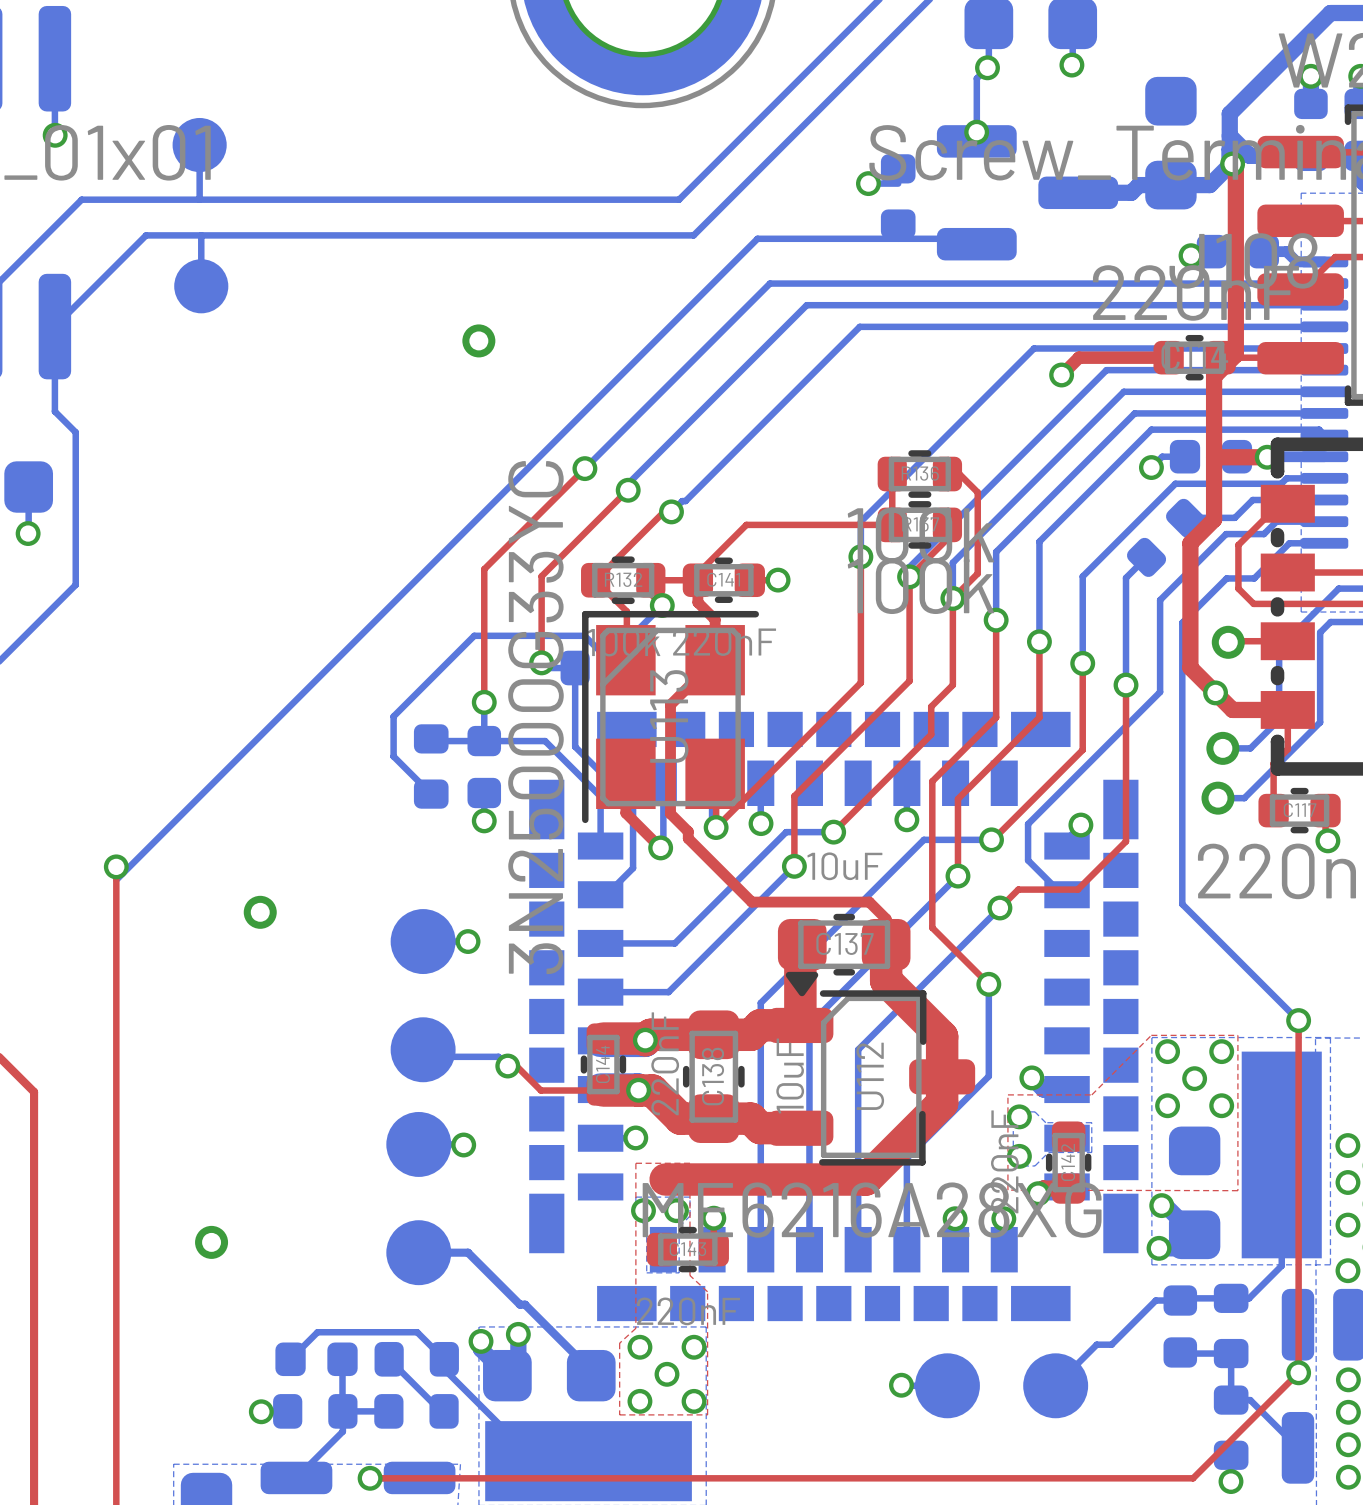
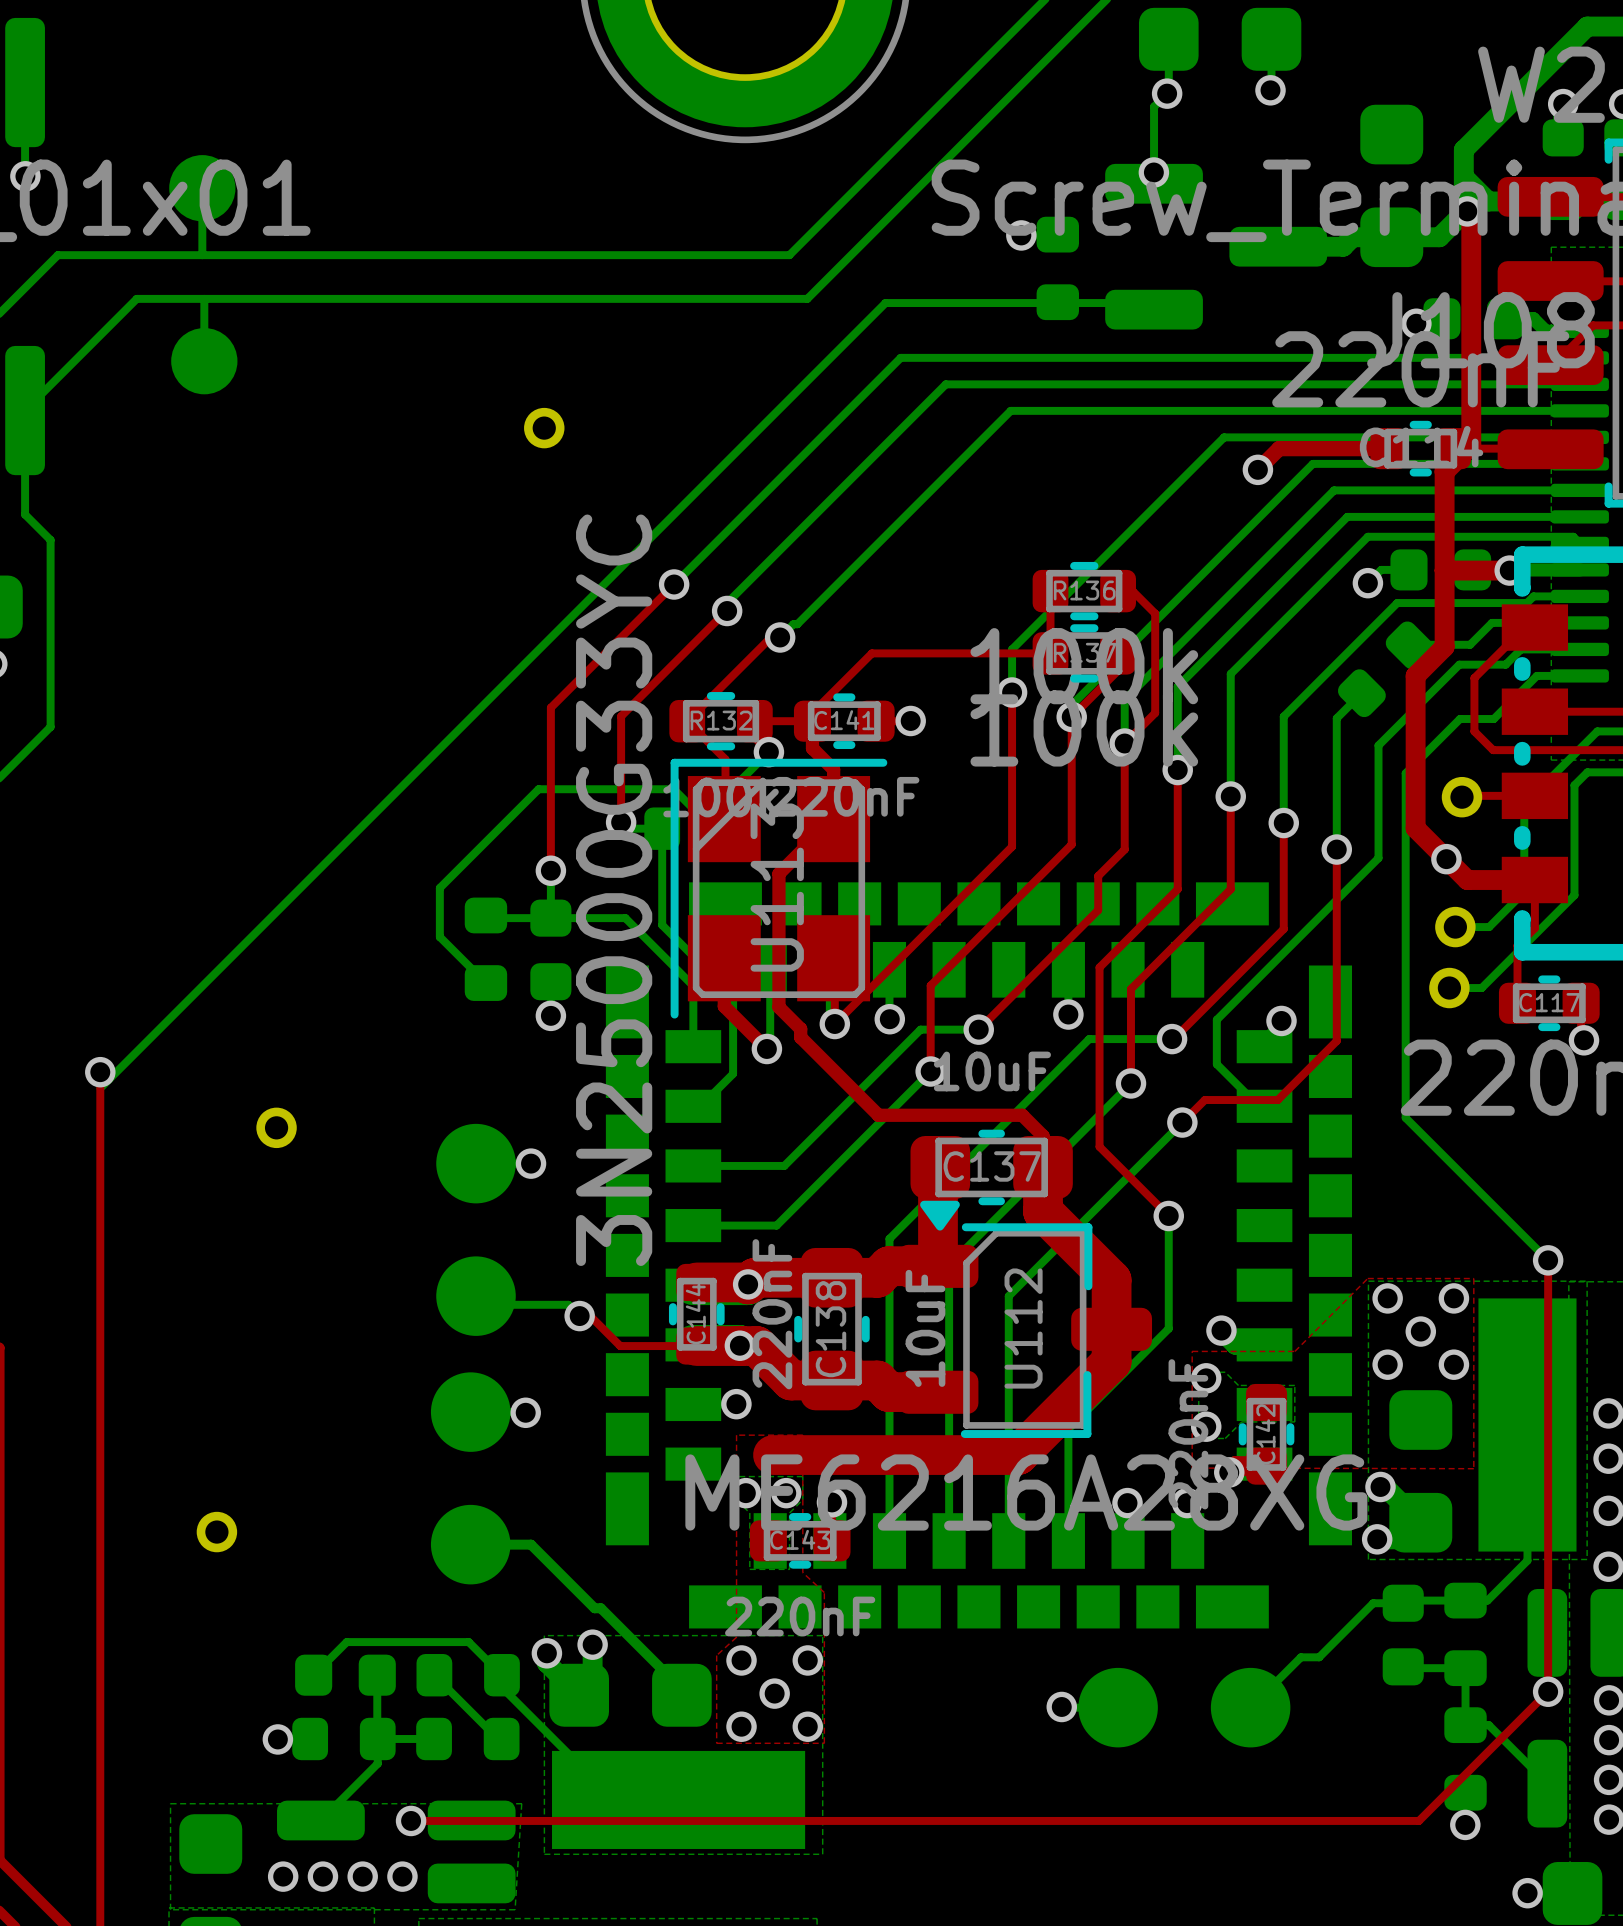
part position: (898, 196) -> (1057, 268)

